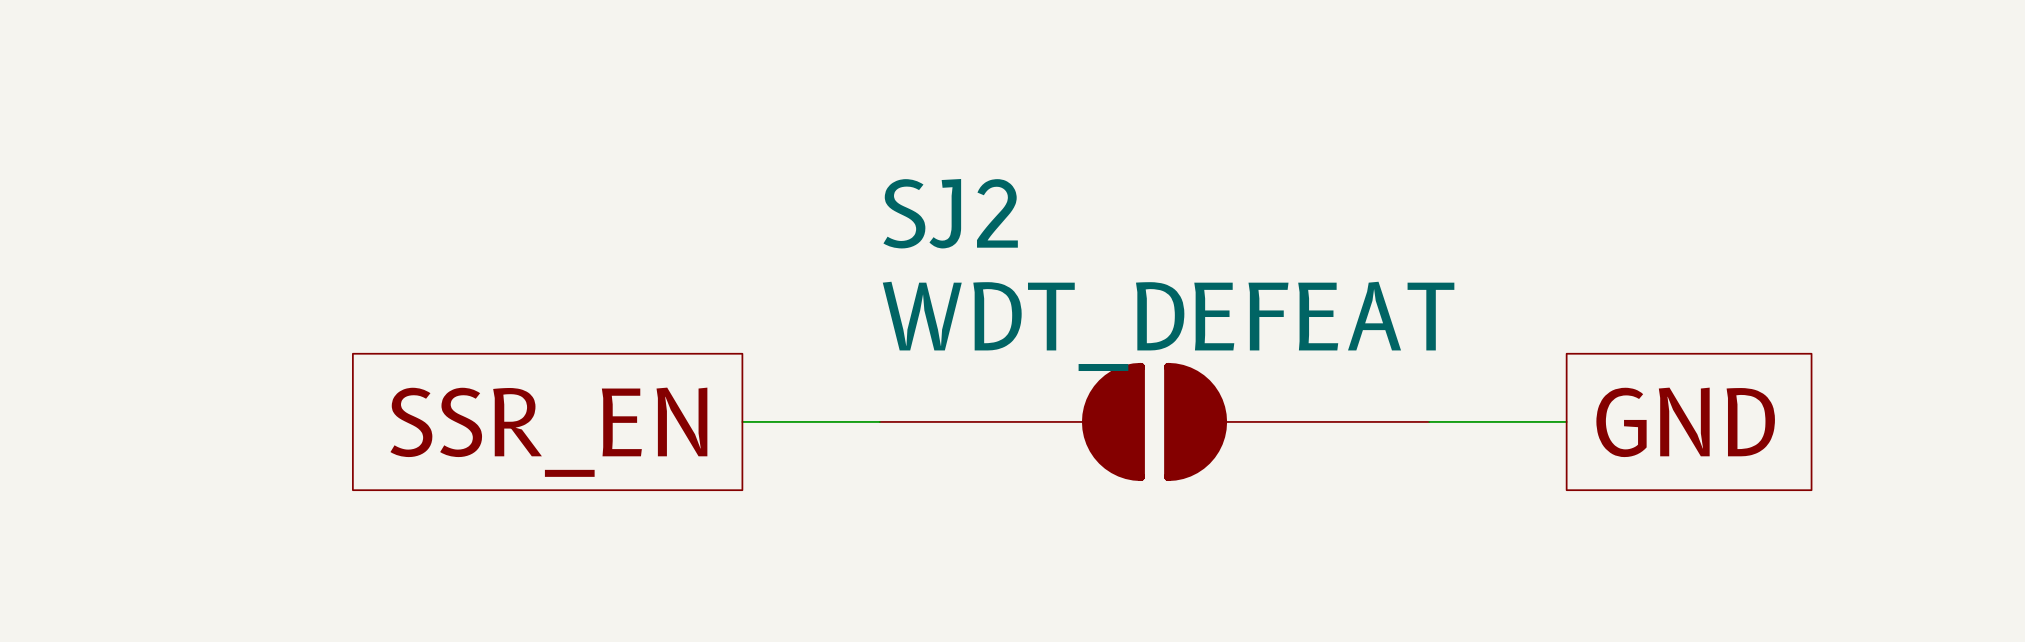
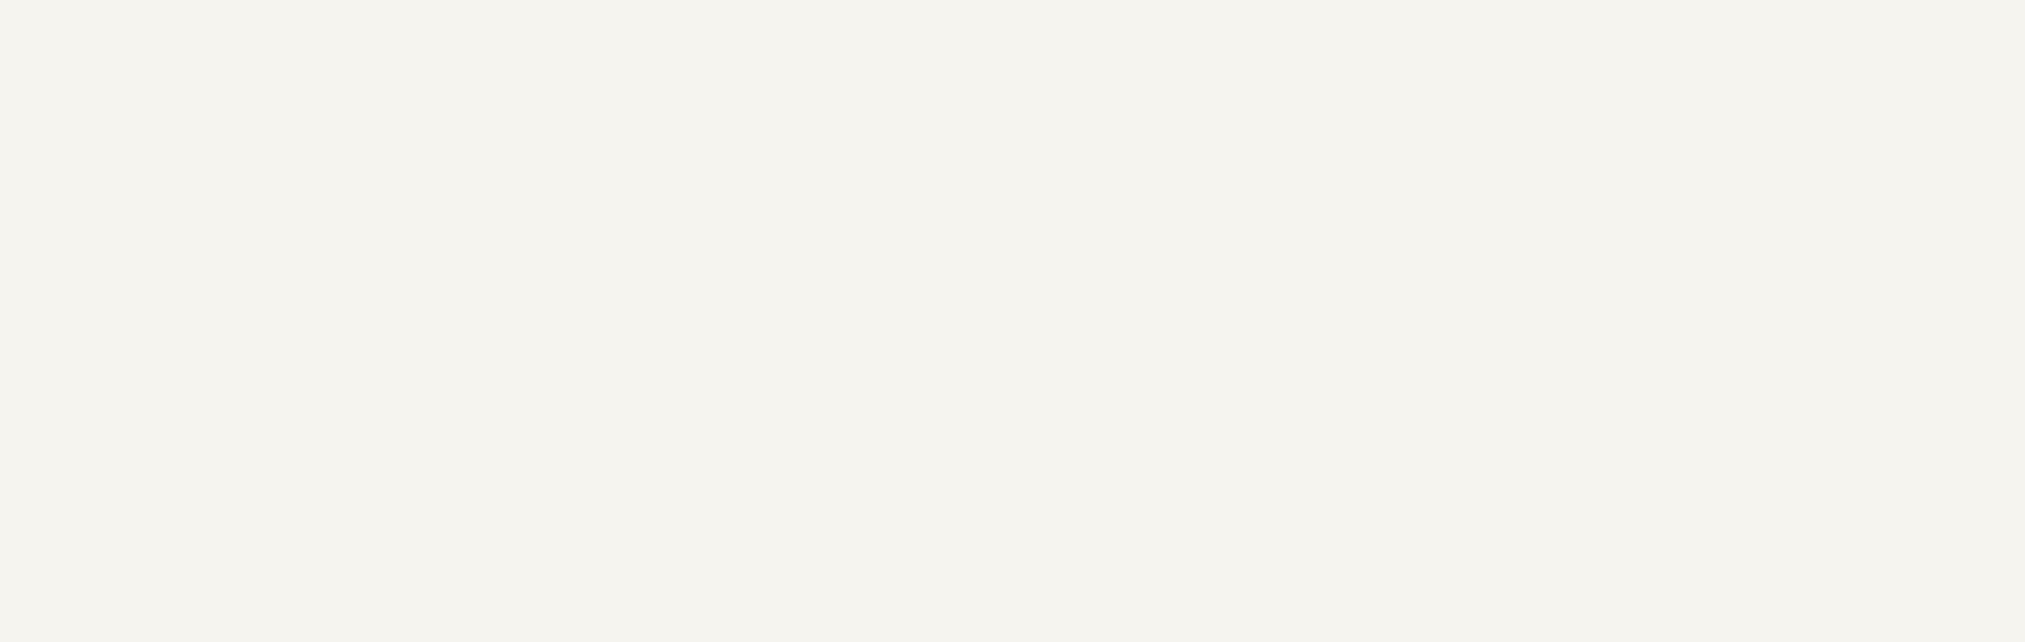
wire: (742, 421) (879, 421) -> none
SJ2: WDT_DEFEAT (1154, 421) -> none
wire: (1429, 421) (1566, 421) -> none
global label: GND (1685, 422) -> none
global label: SSR_EN (548, 432) -> none

